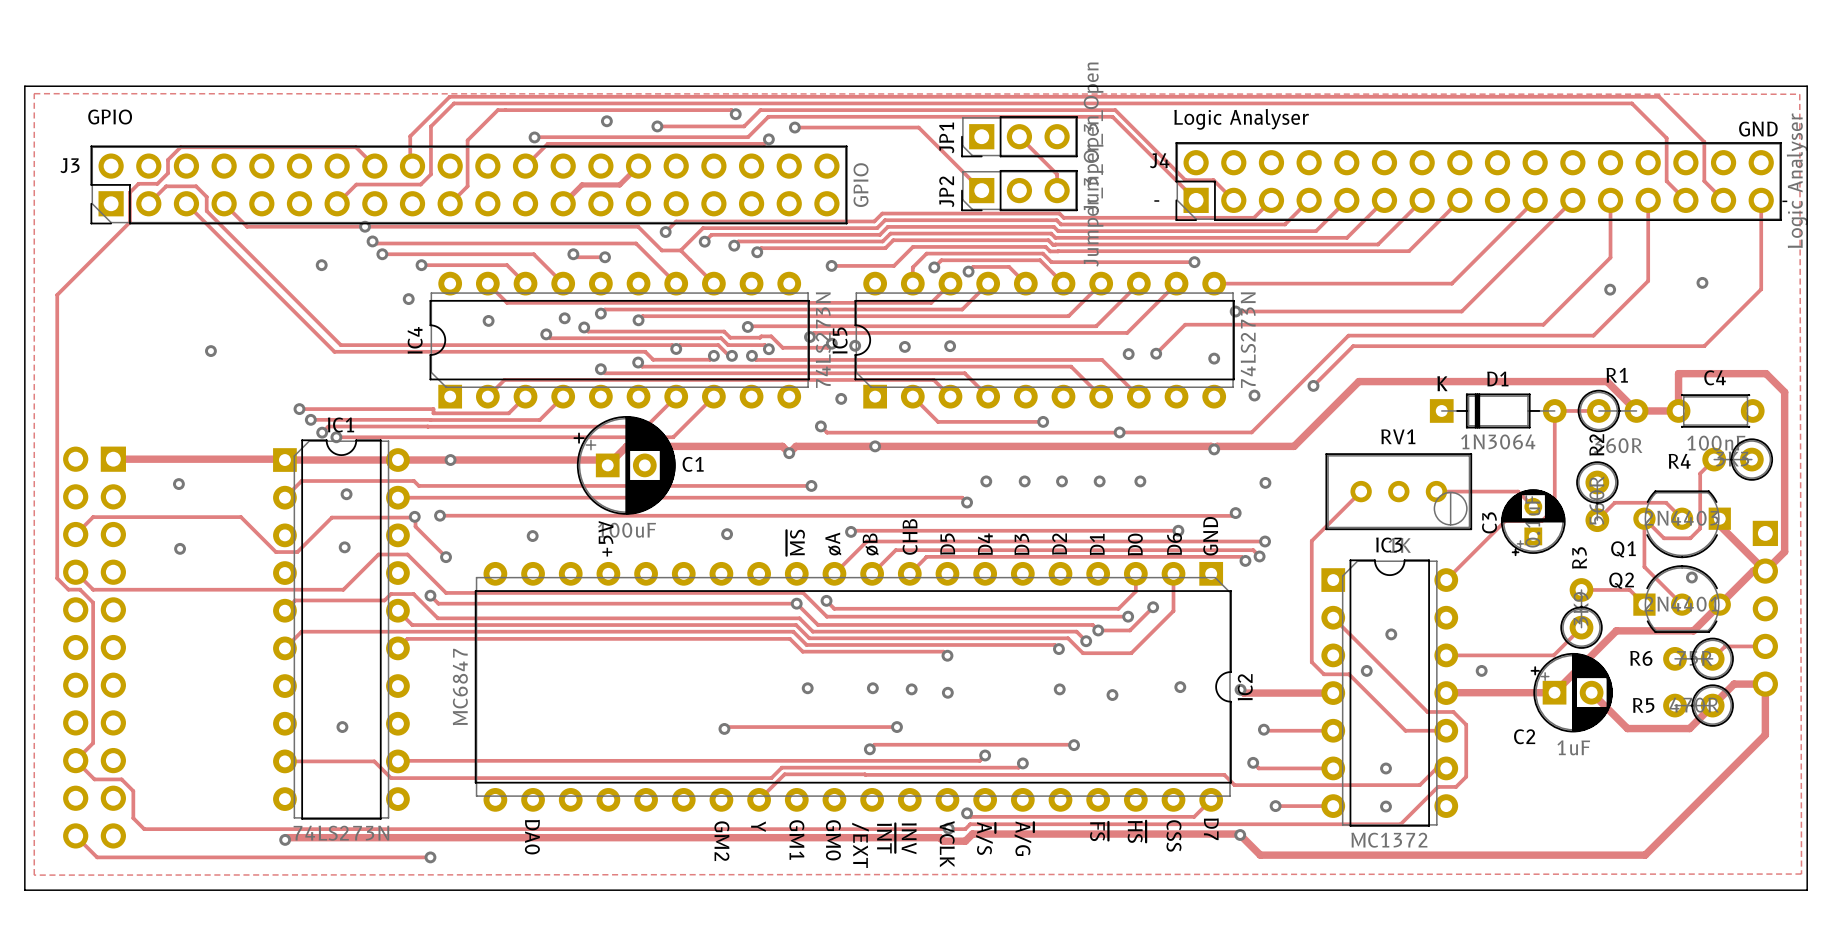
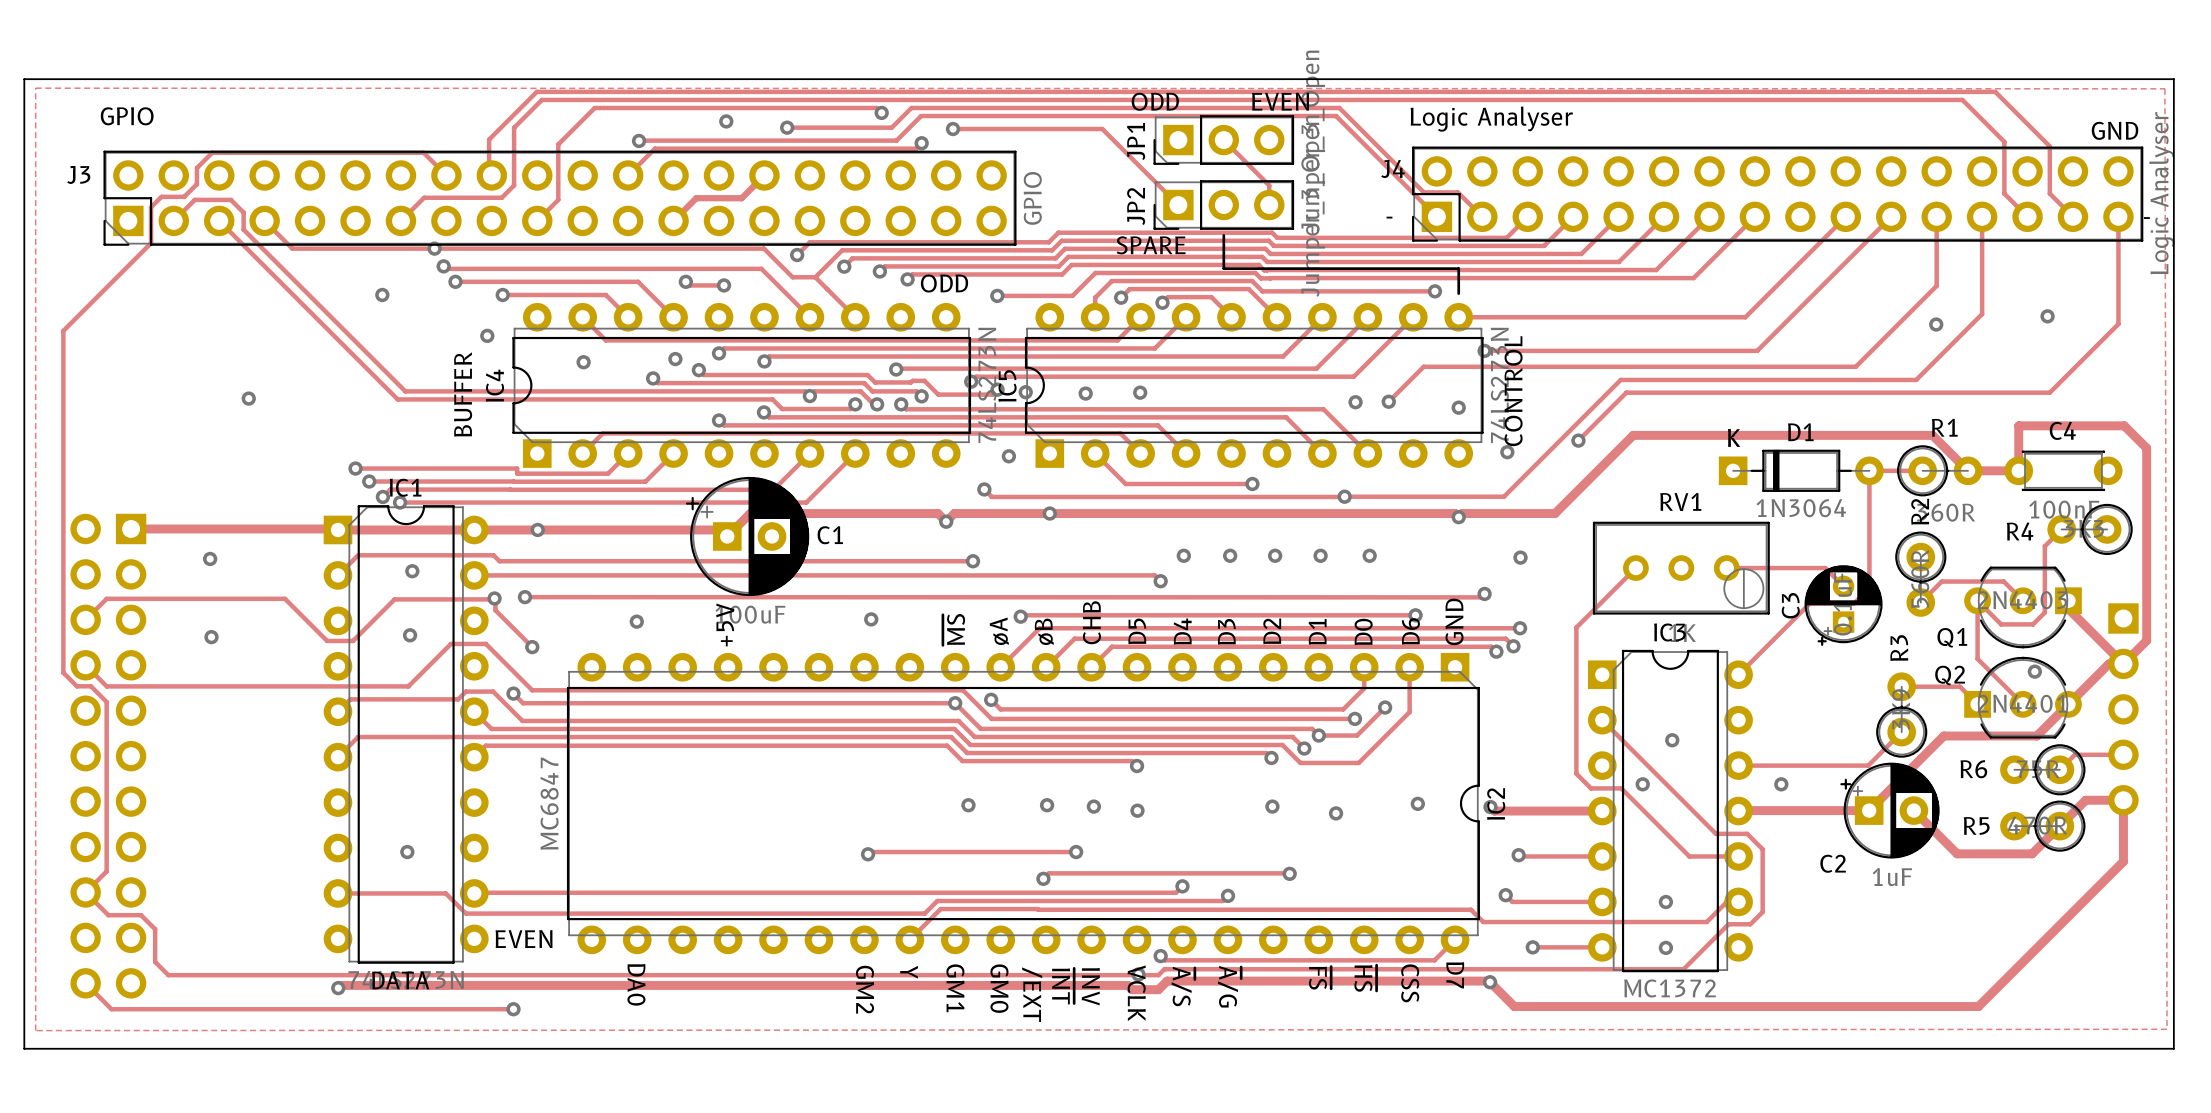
text: none -> ODD (1155, 101)
text: none -> EVEN (1280, 101)
line: none -> (1223, 235) (1223, 268) (1458, 268) (1458, 293)
text: none -> SPARE (1151, 245)
text: none -> ODD (944, 283)
text: none -> CONTROL (1513, 391)
text: none -> BUFFER (463, 394)
text: none -> EVEN (523, 939)
text: none -> DATA (400, 980)

